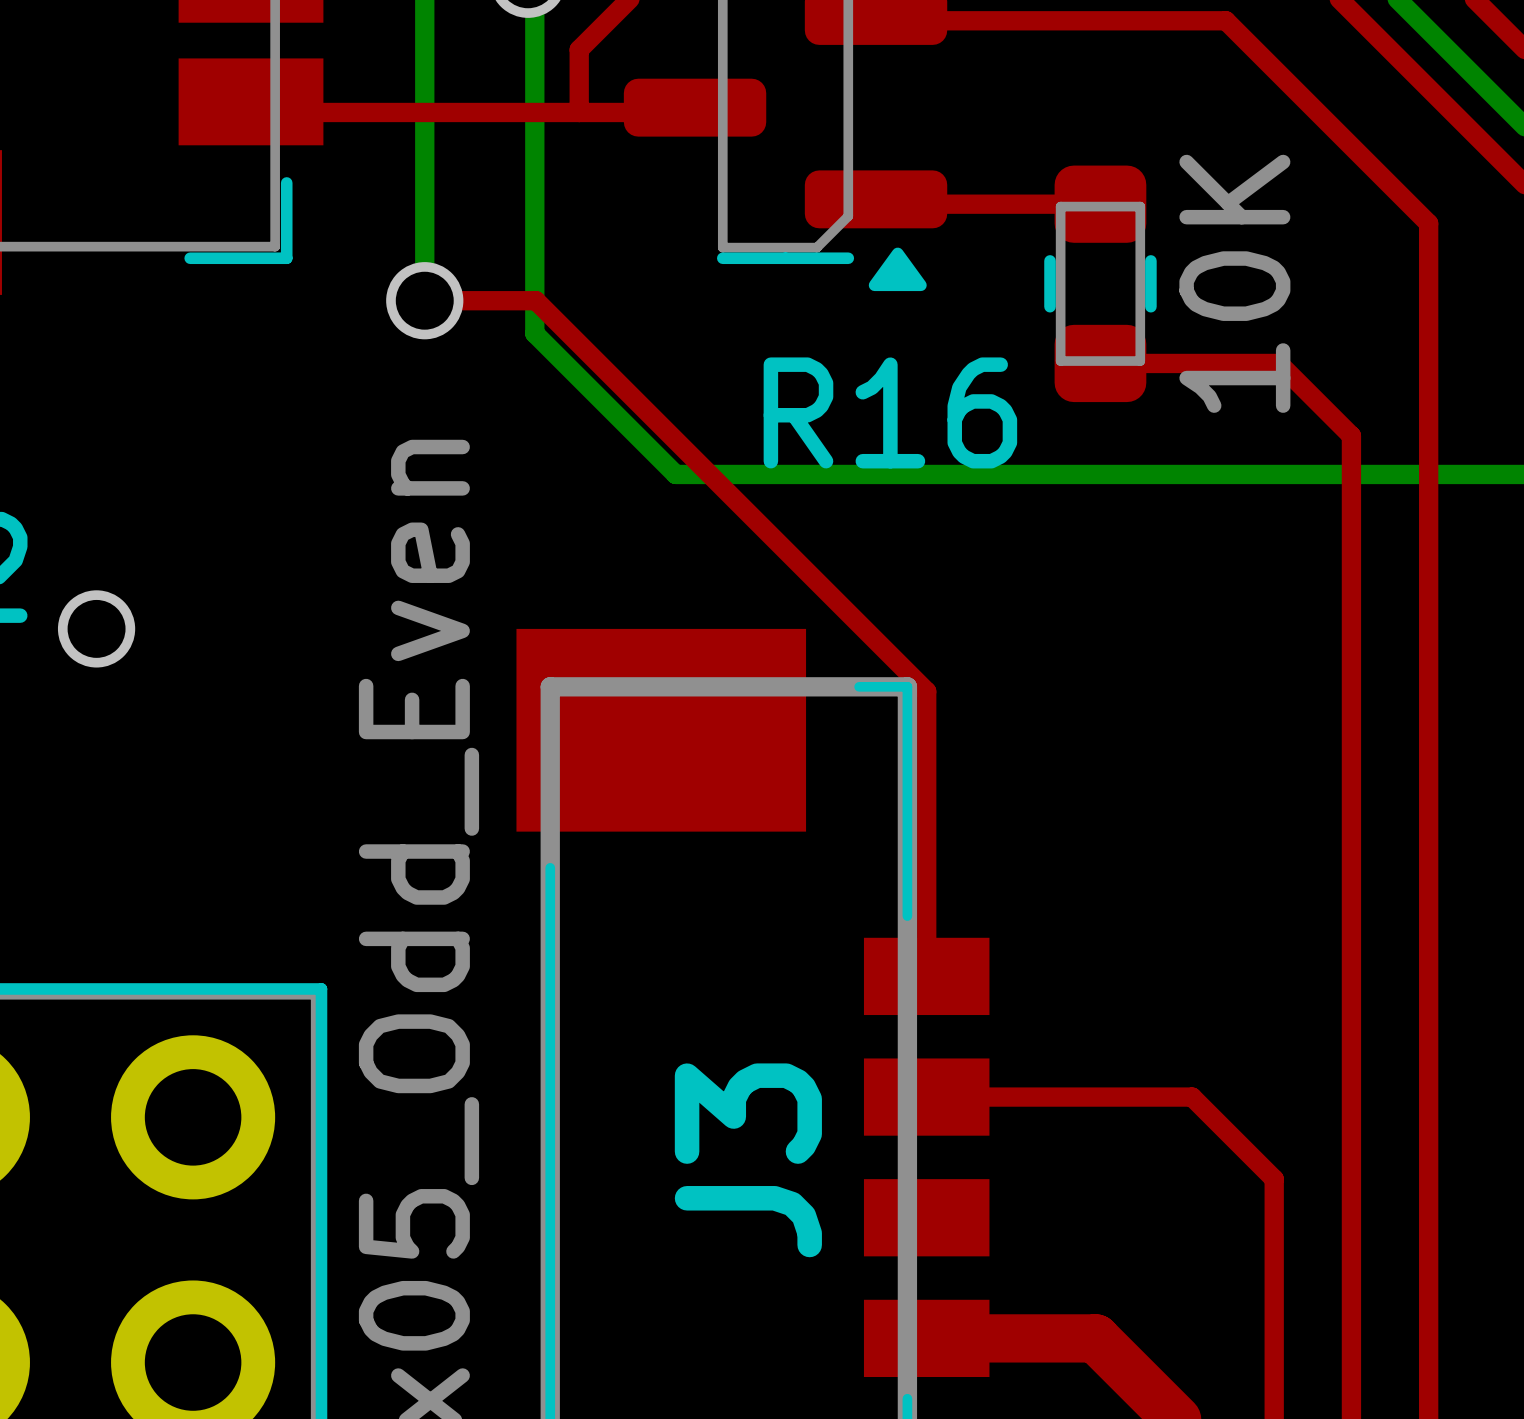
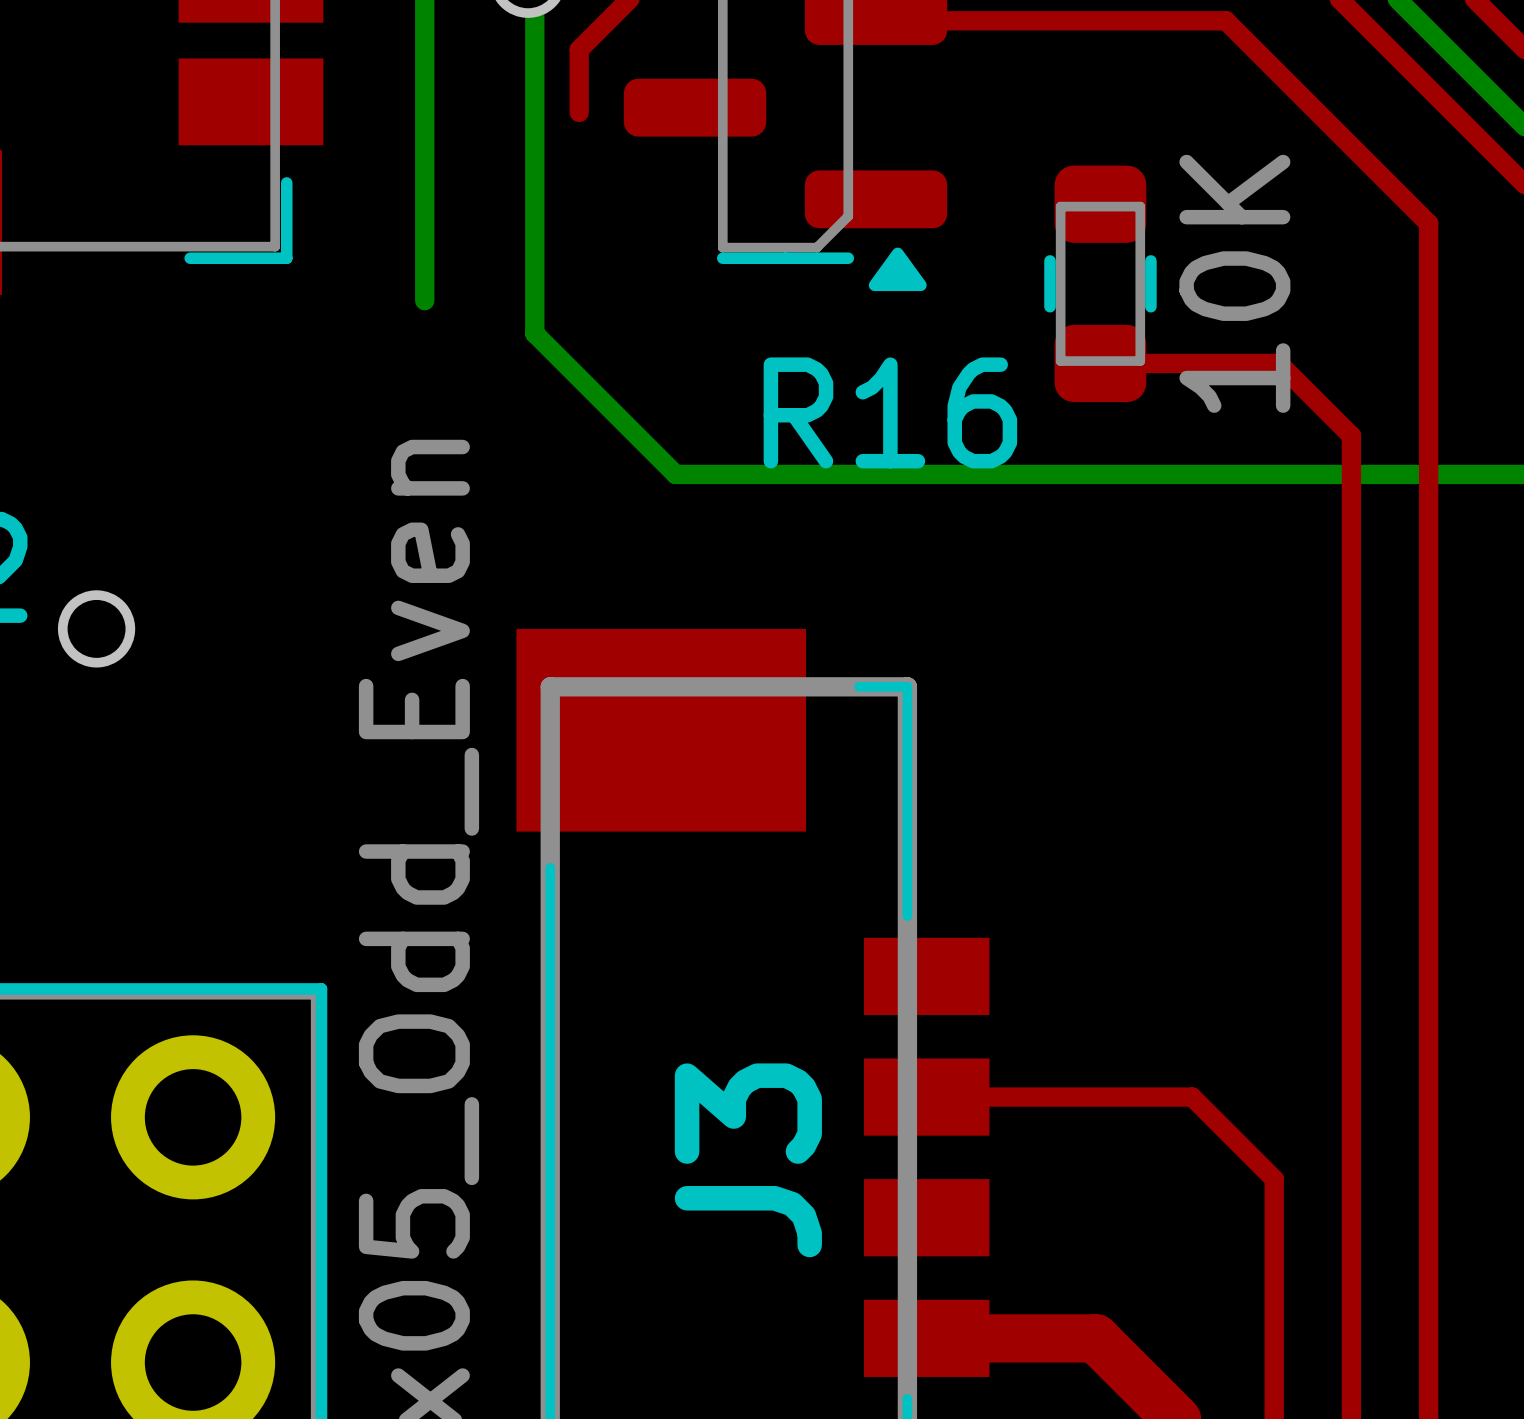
top track: (251, 101) (261, 112) (695, 112) -> none
top track: (1100, 204) (876, 204) (868, 211) -> none
via: (424, 300) -> none
top track: (444, 300) (535, 300) (926, 691) (926, 976) -> none

